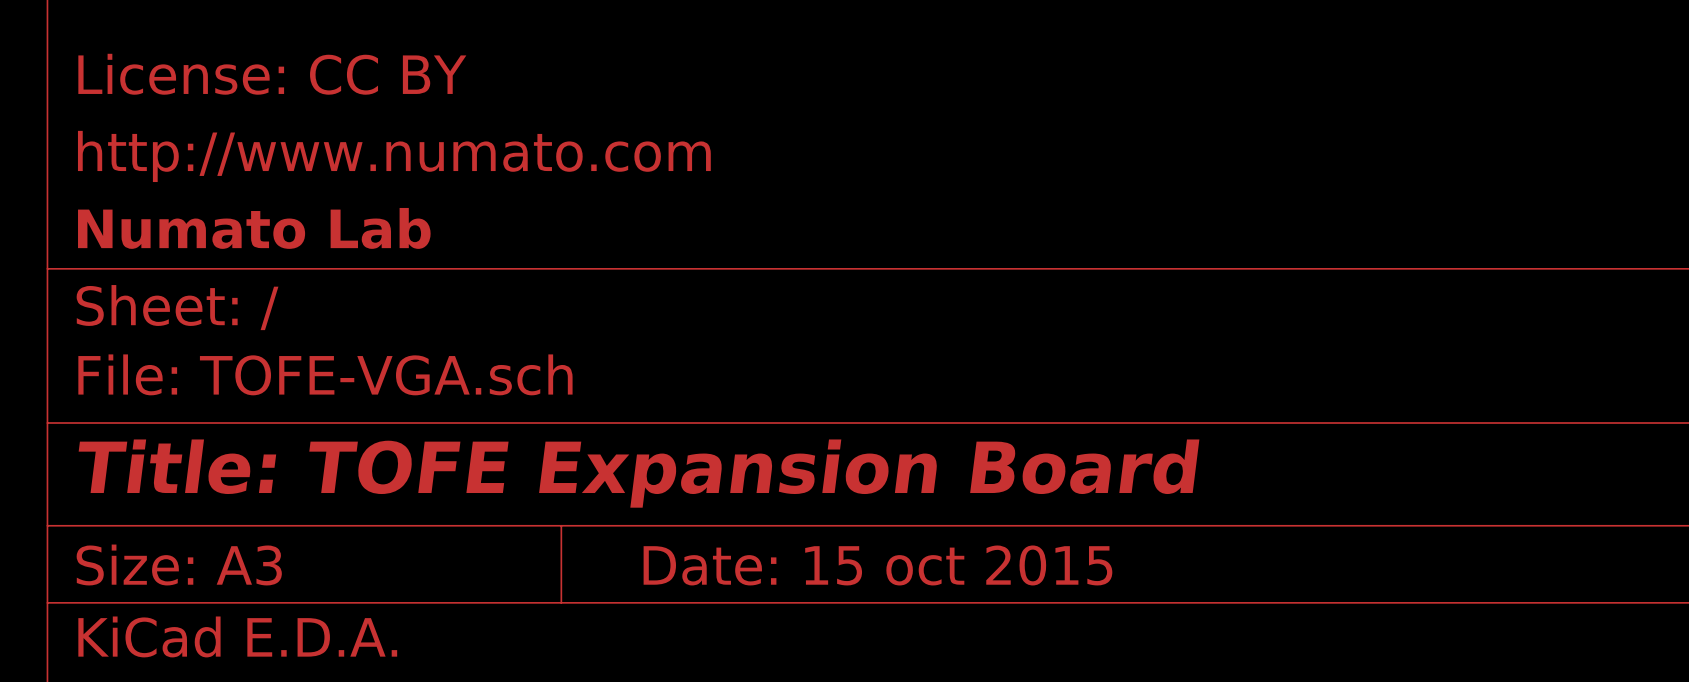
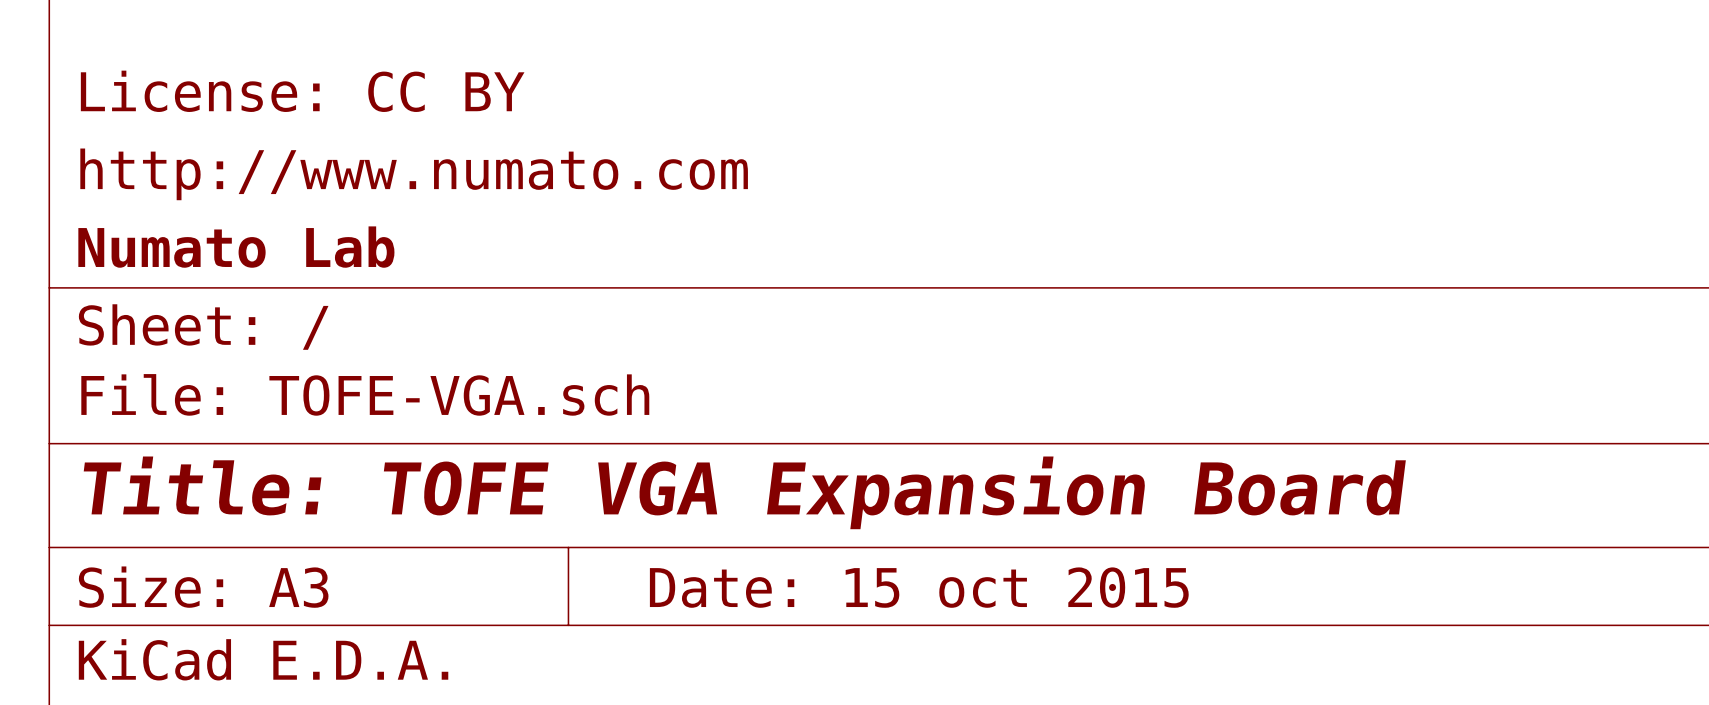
title block: Title: TOFE Expansion Board (639, 473) -> Title: TOFE VGA Expansion Board (744, 492)

